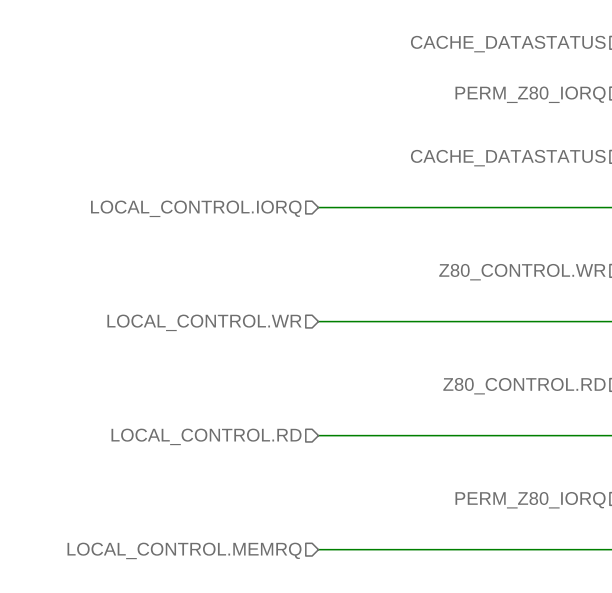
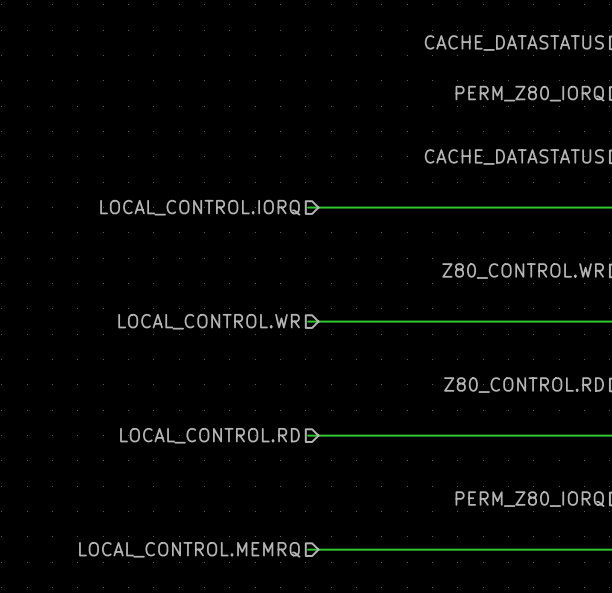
wire: none -> (308, 207) (318, 207)
wire: none -> (308, 321) (318, 321)
wire: none -> (308, 435) (318, 435)
wire: none -> (308, 549) (318, 549)

